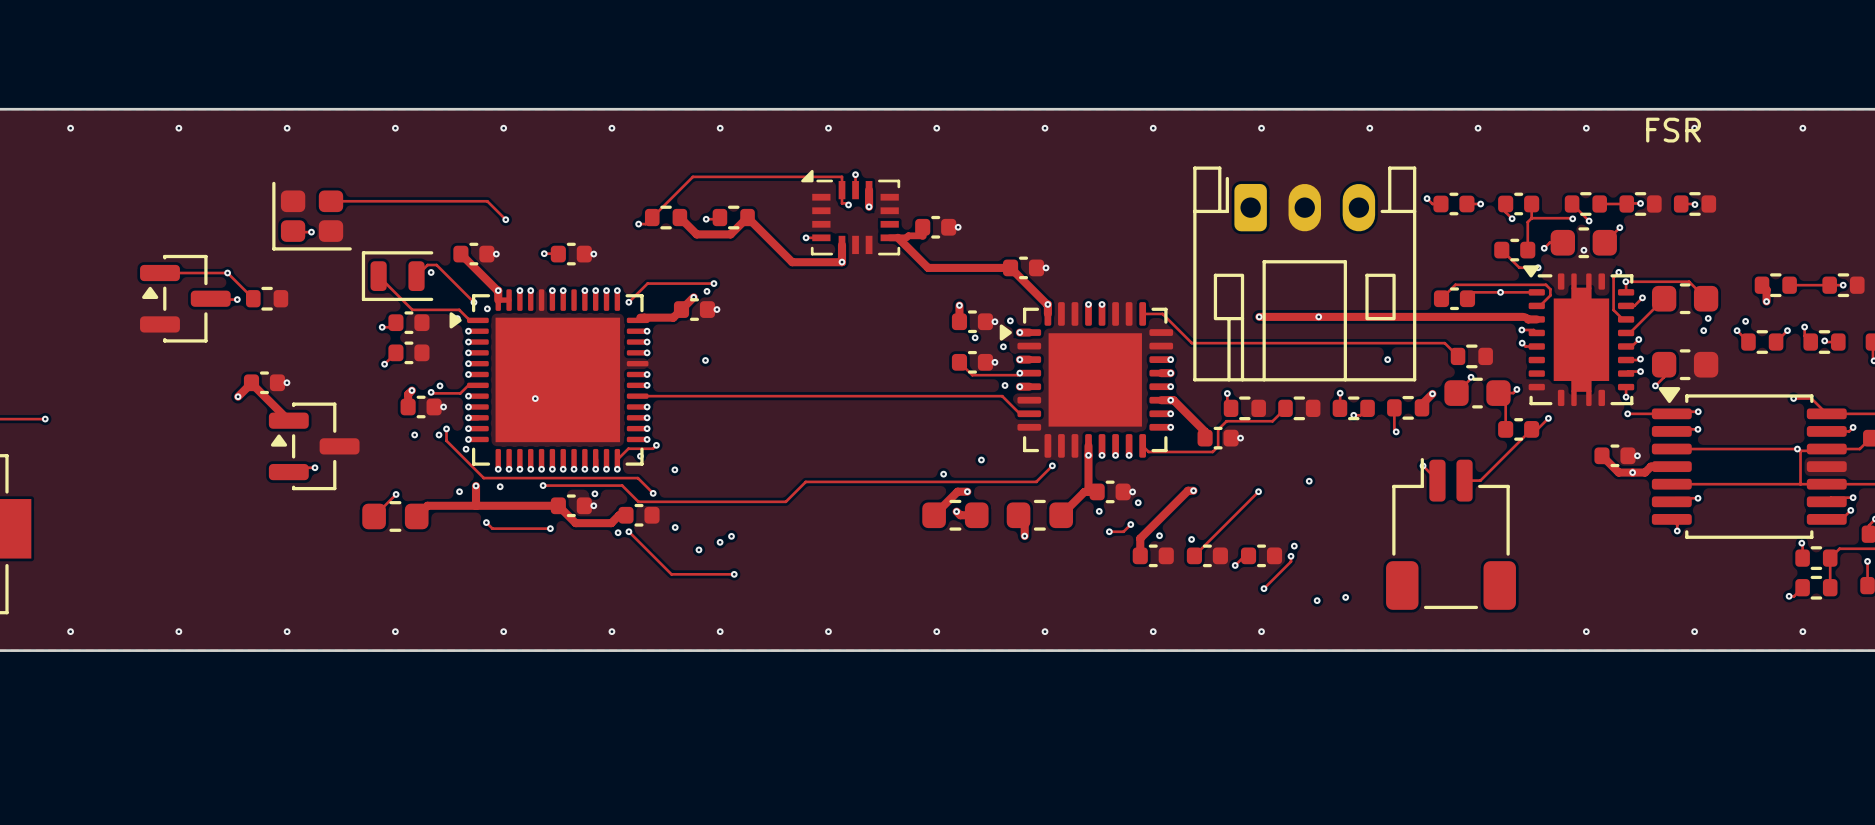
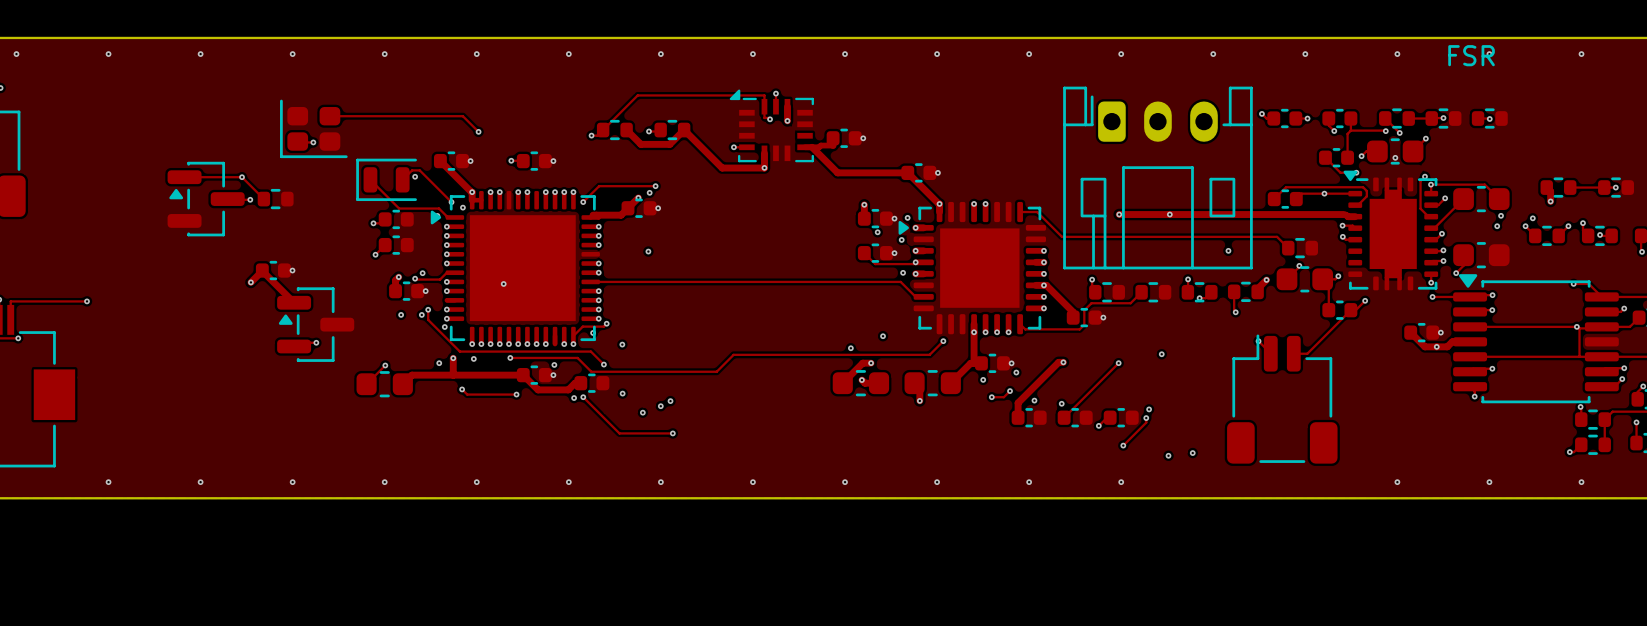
via: (468, 417) -> none
via: (595, 469) -> none

